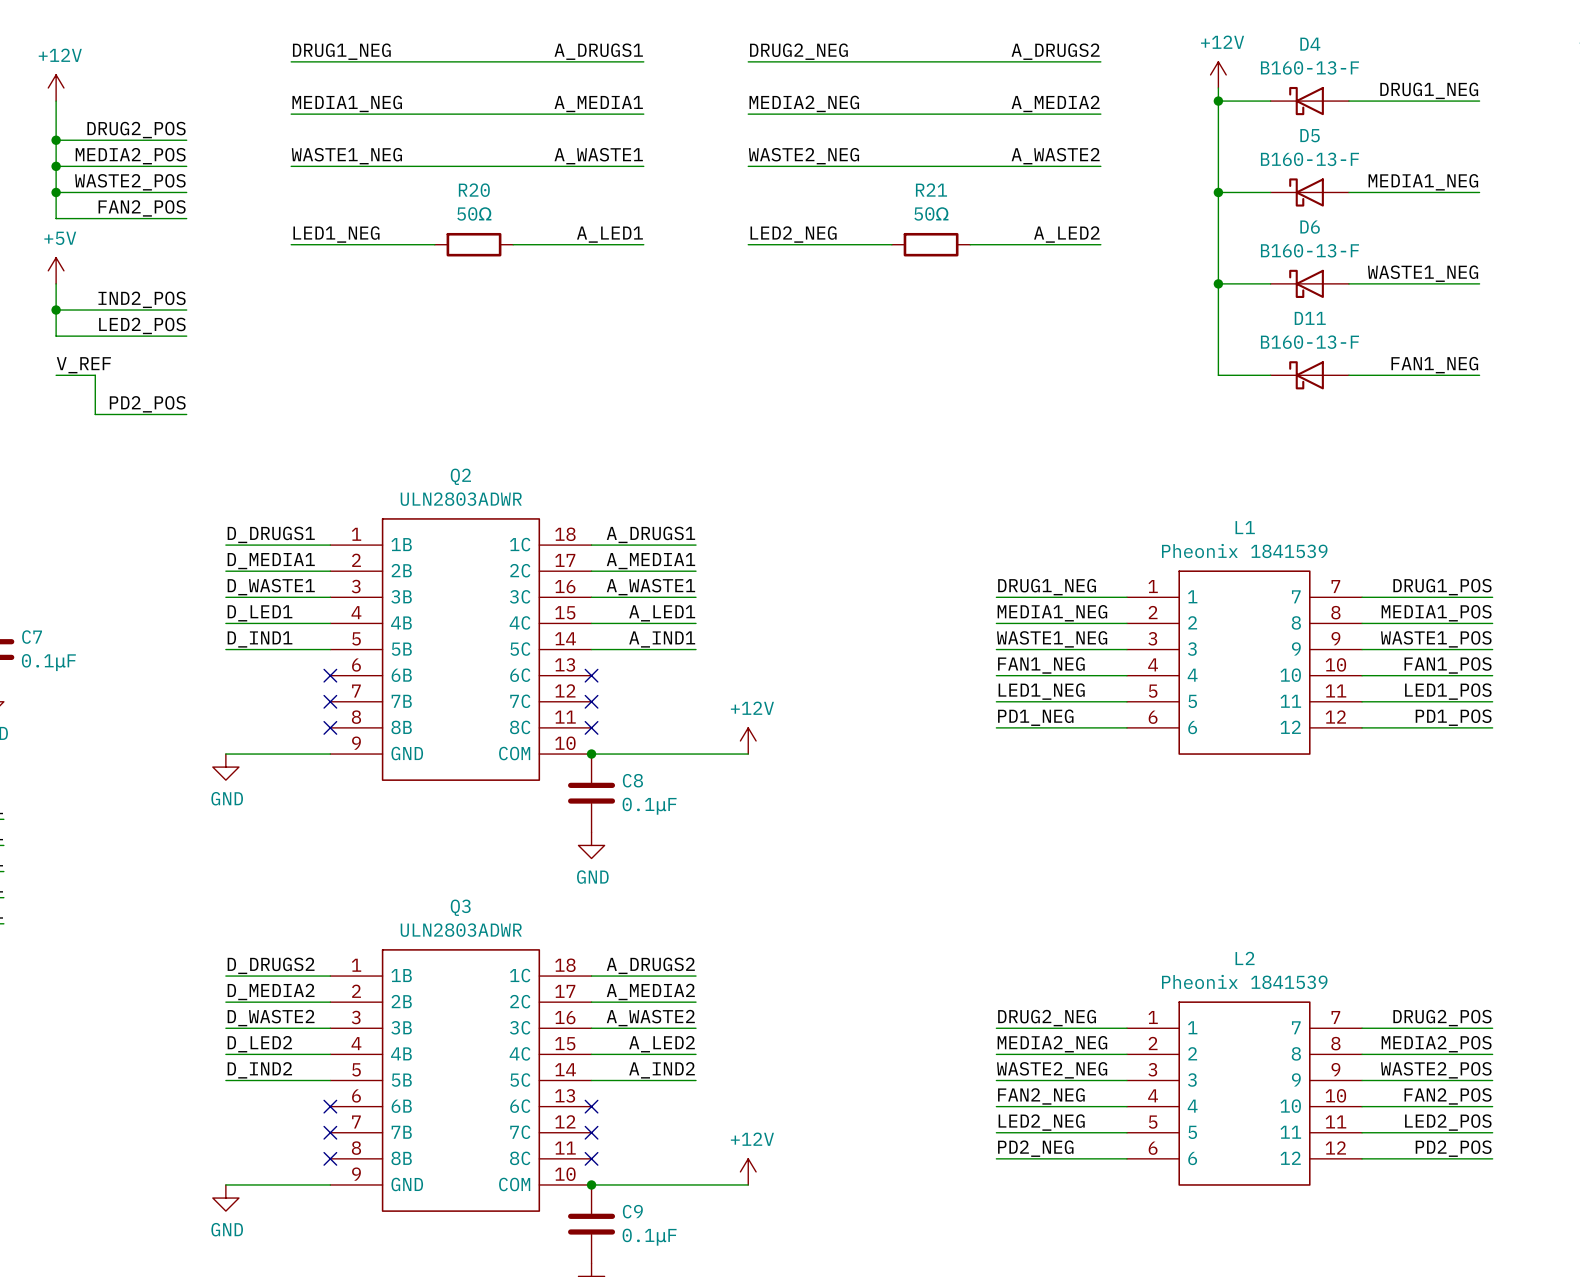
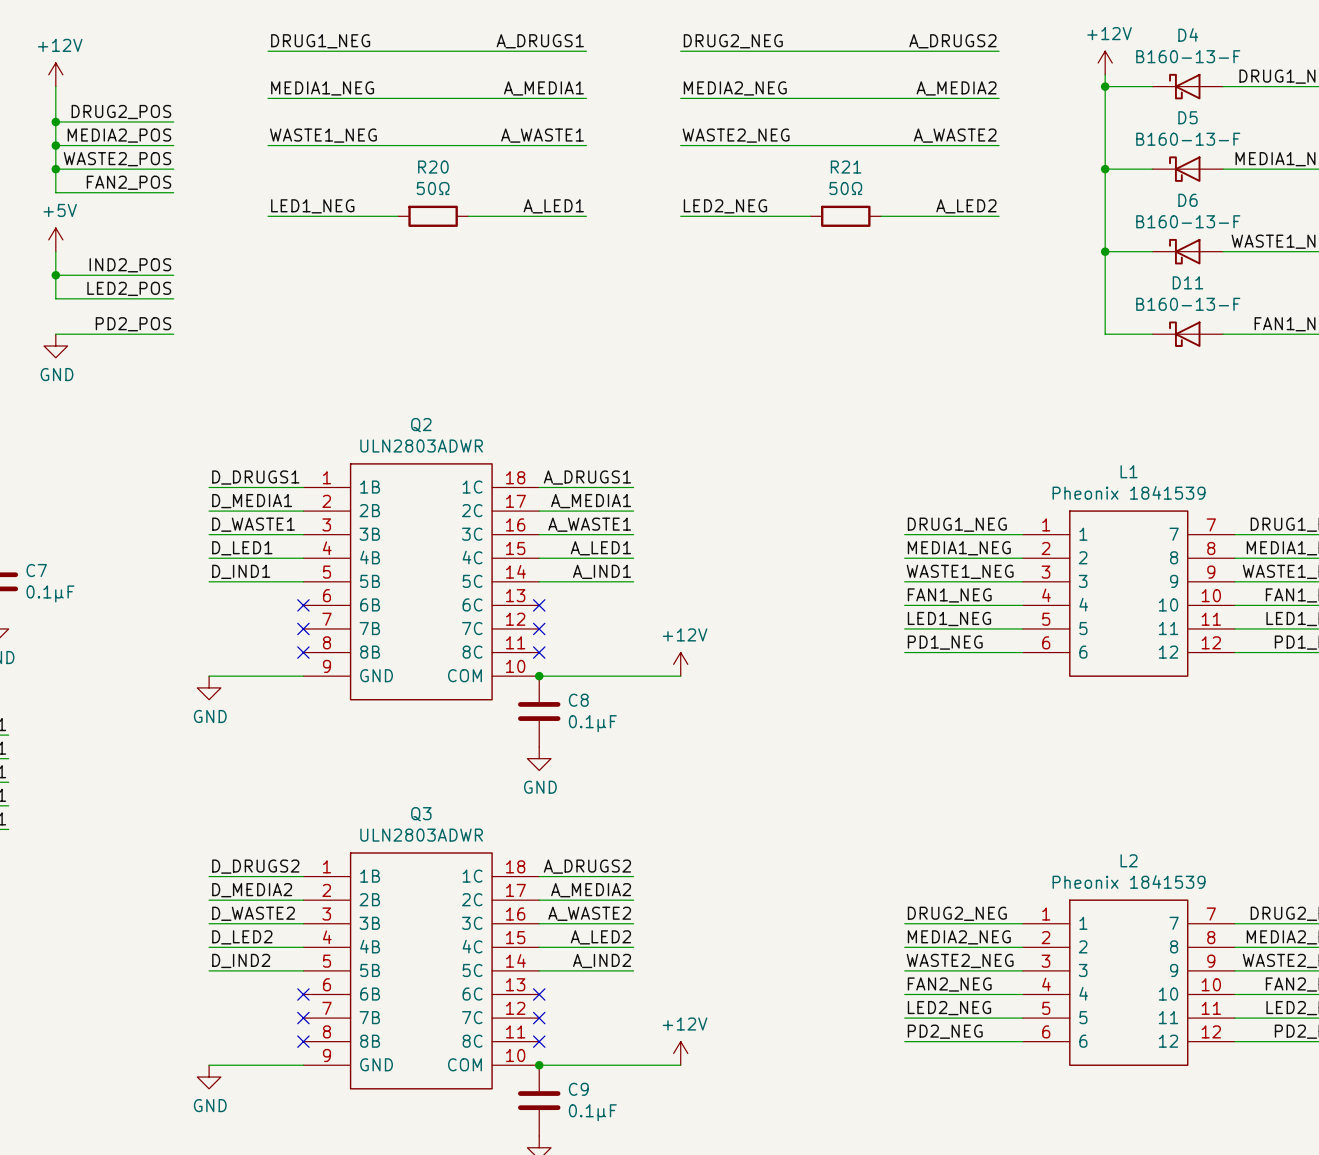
label: V_REF (83, 365) -> none
wire: (95, 375) (95, 414) (186, 414) -> (91, 334) (173, 334)
power symbol: none -> GND (55, 346)
label position: PD2_POS (147, 404) -> PD2_POS (133, 324)

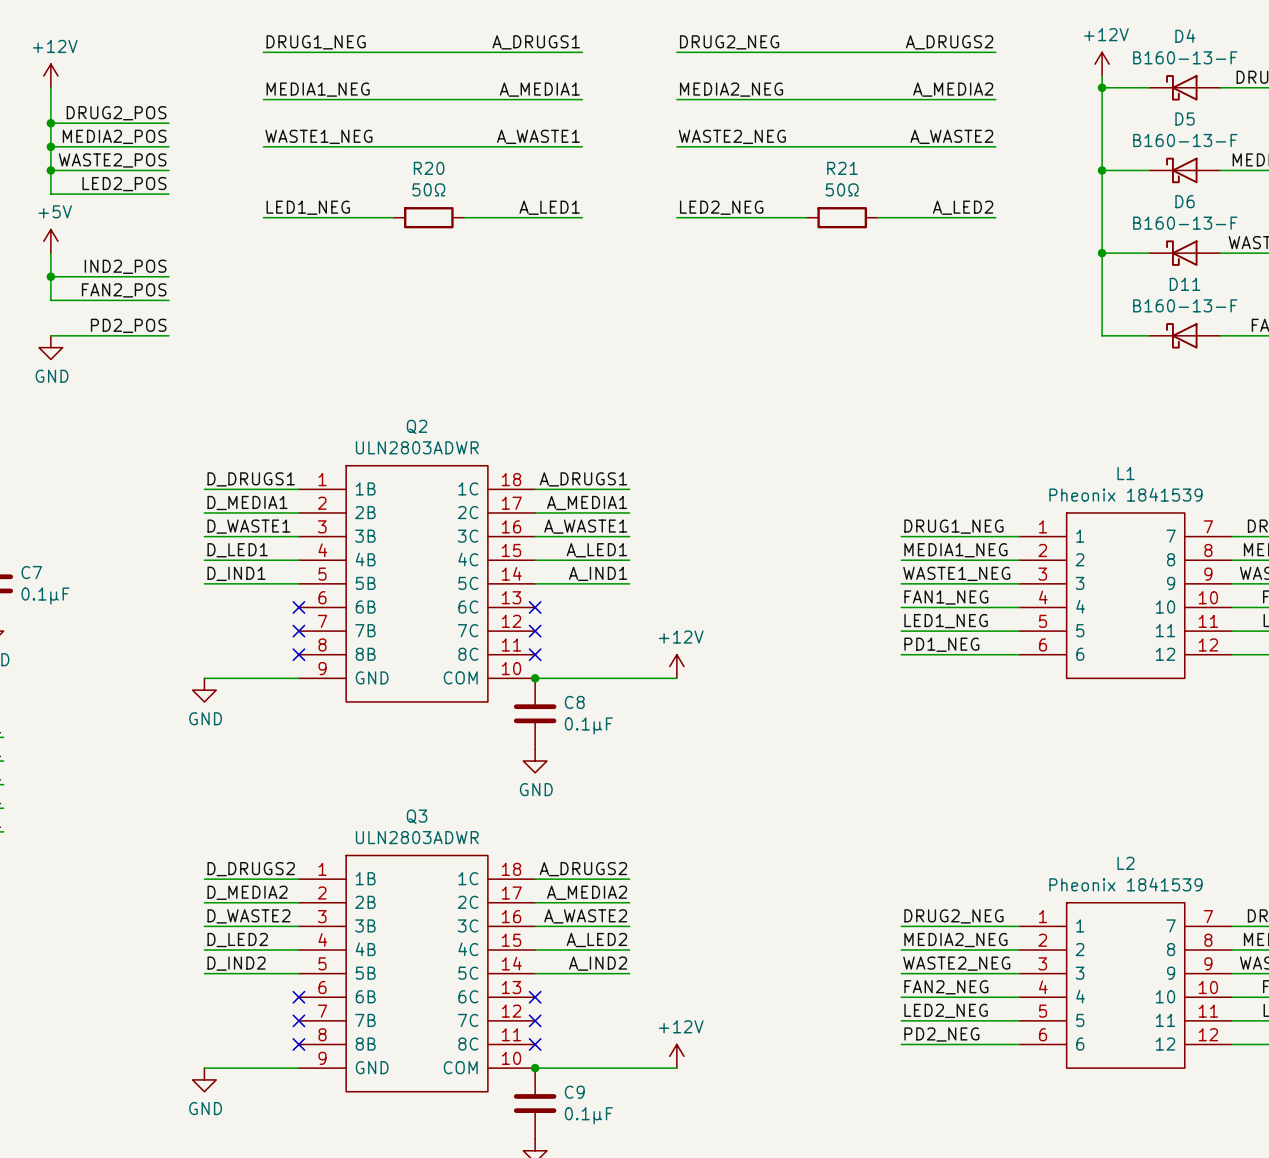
label: FAN2_POS (128, 182) -> LED2_POS (124, 184)
label: LED2_POS (129, 288) -> FAN2_POS (124, 290)

